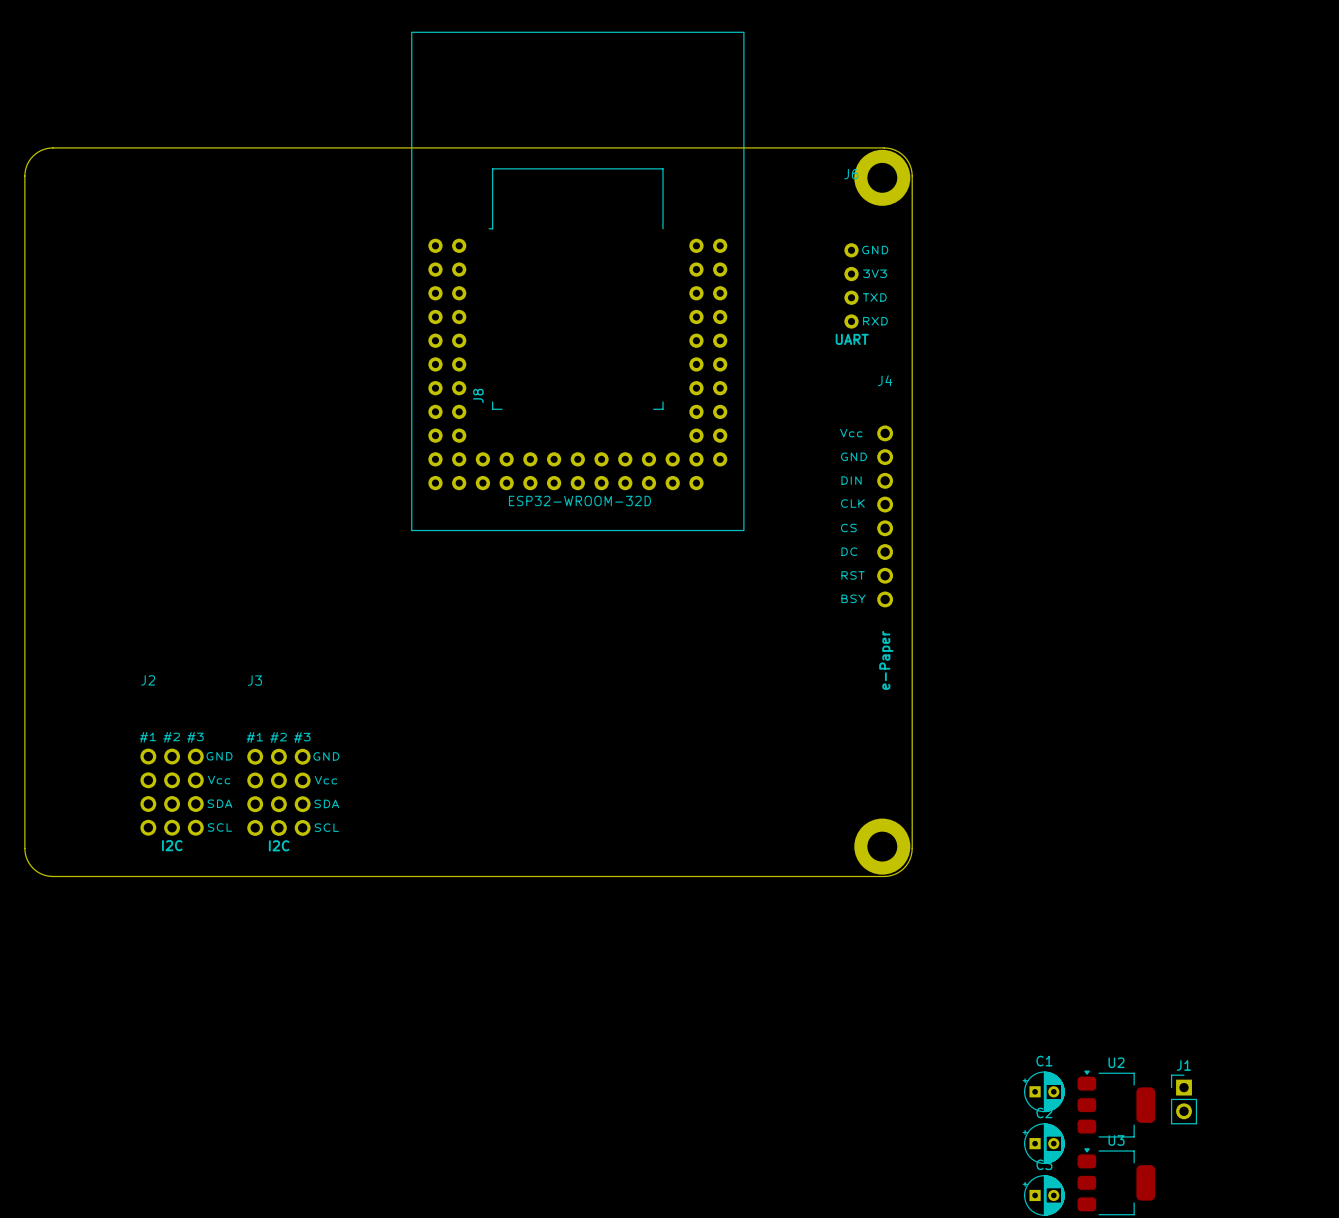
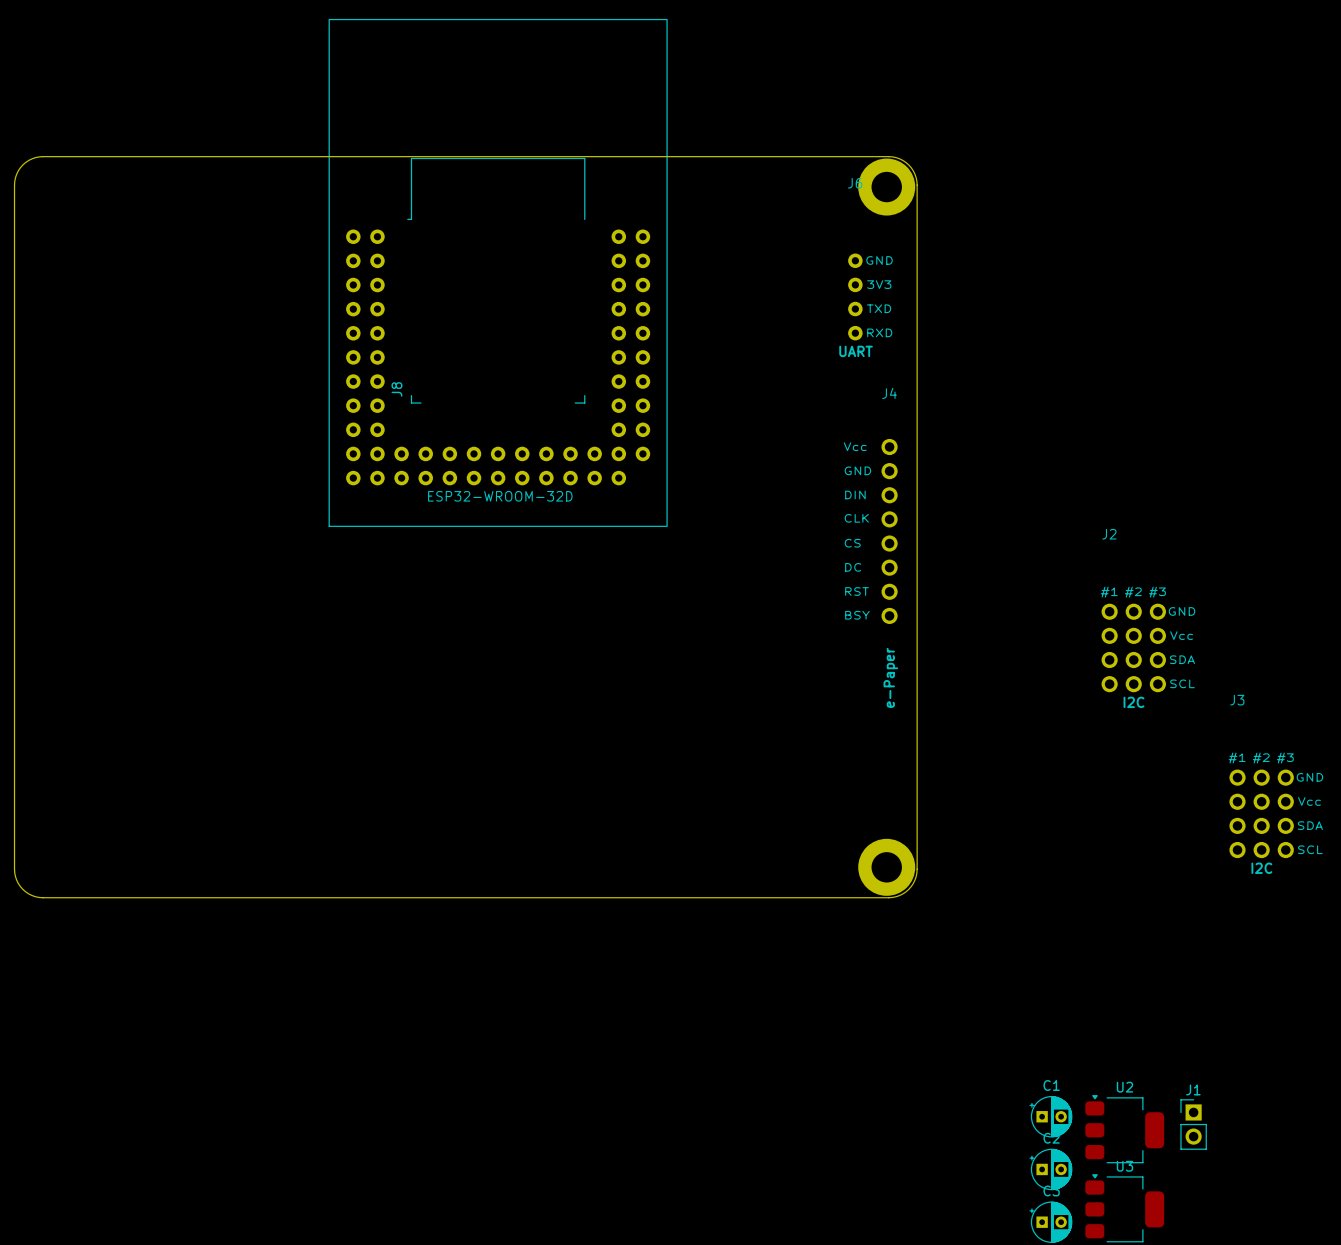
J8 position: (577, 281) -> (498, 272)
J2 position: (172, 792) -> (1133, 647)
J3 position: (278, 792) -> (1261, 813)

